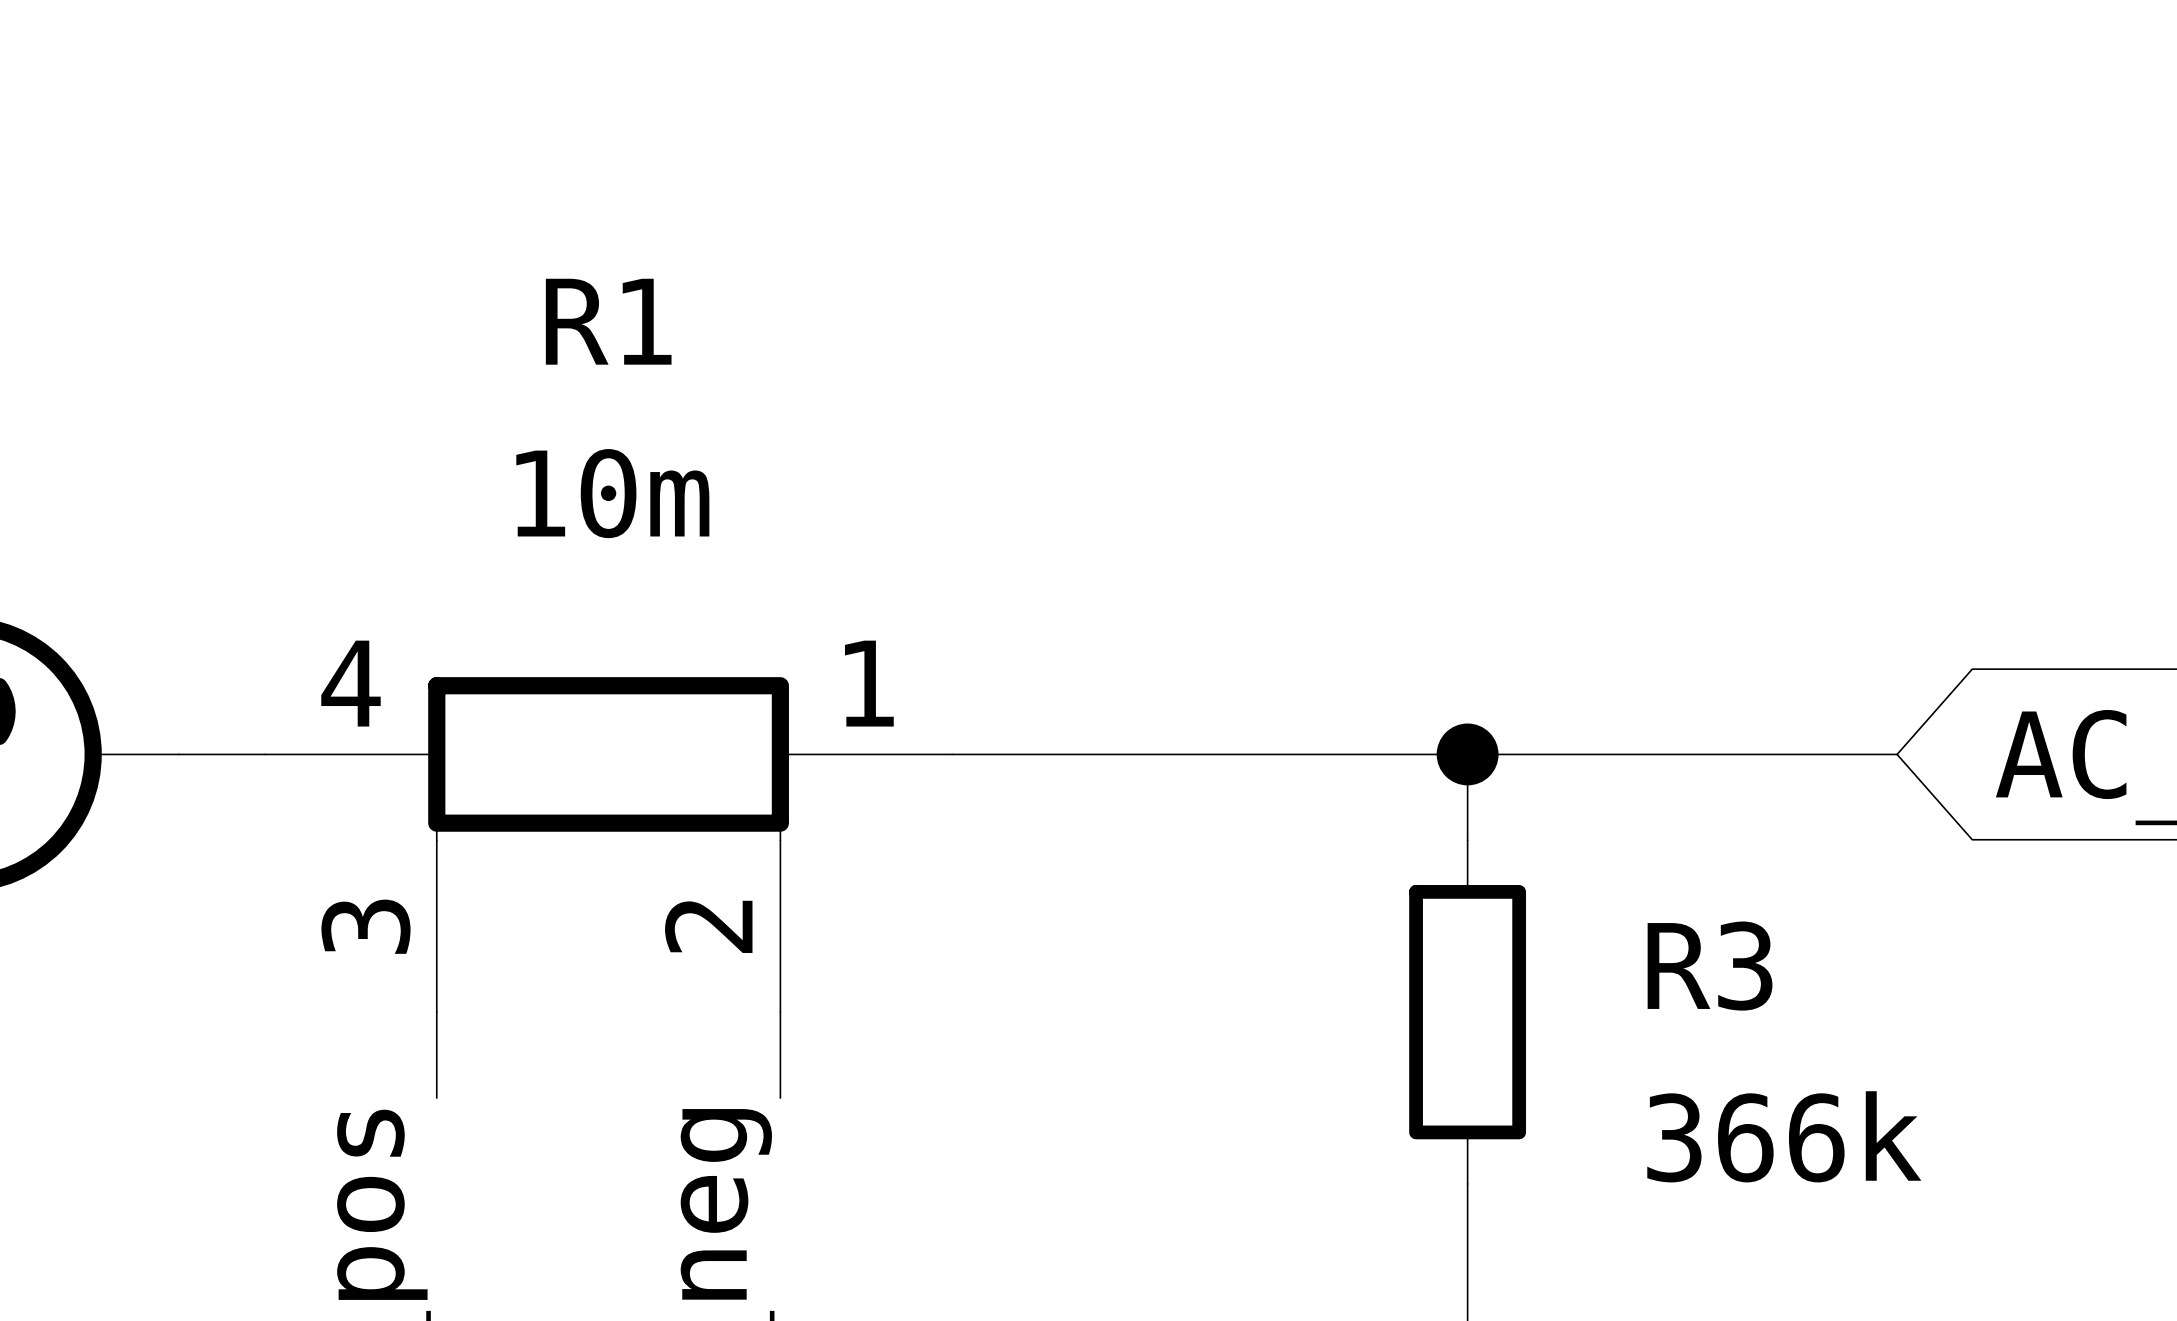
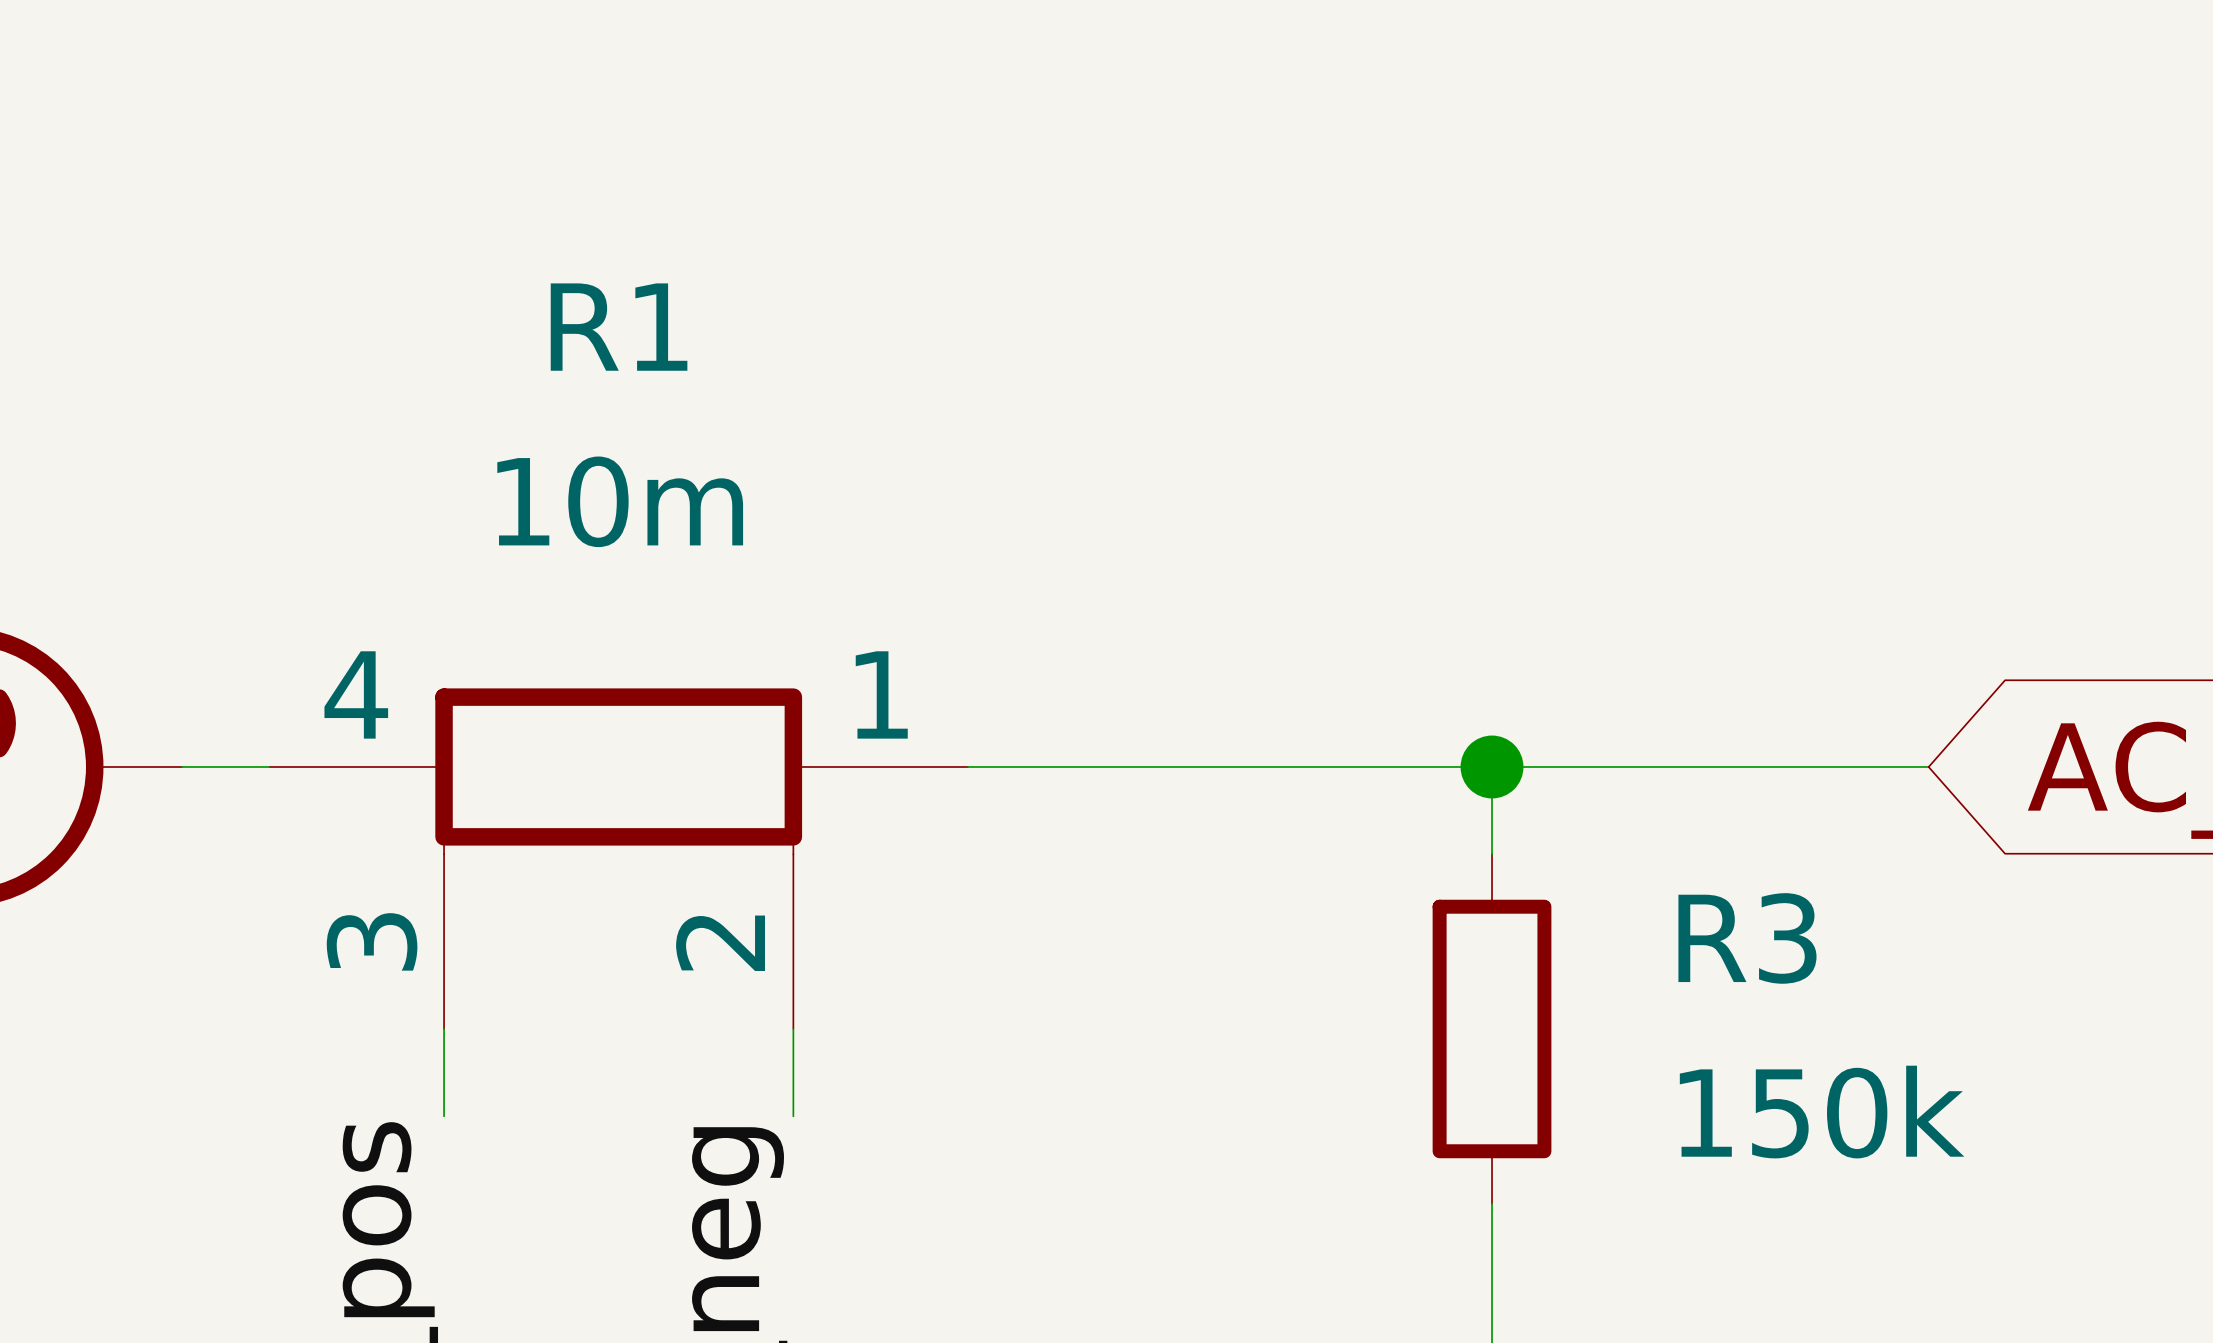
R3 name position: R3 (1710, 966) -> R3 (1747, 938)
R3 value: 366k (1784, 1136) -> 150k (1822, 1112)

